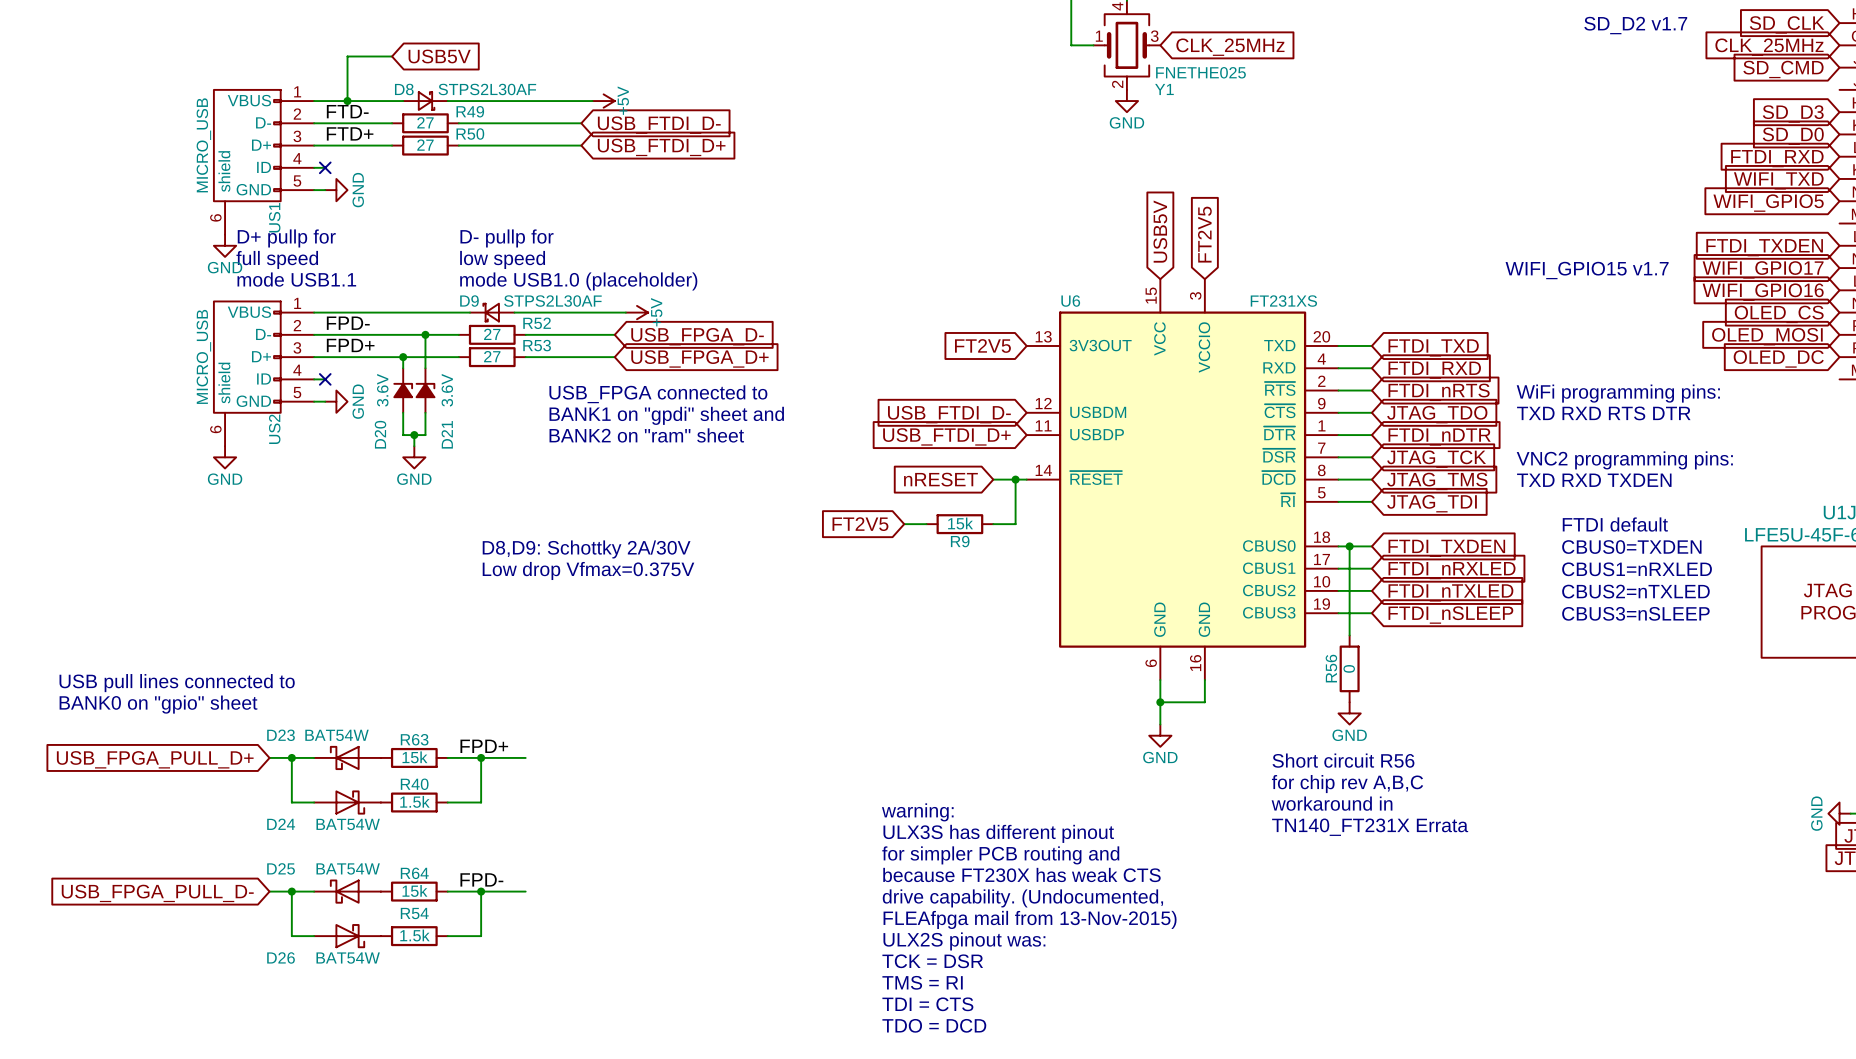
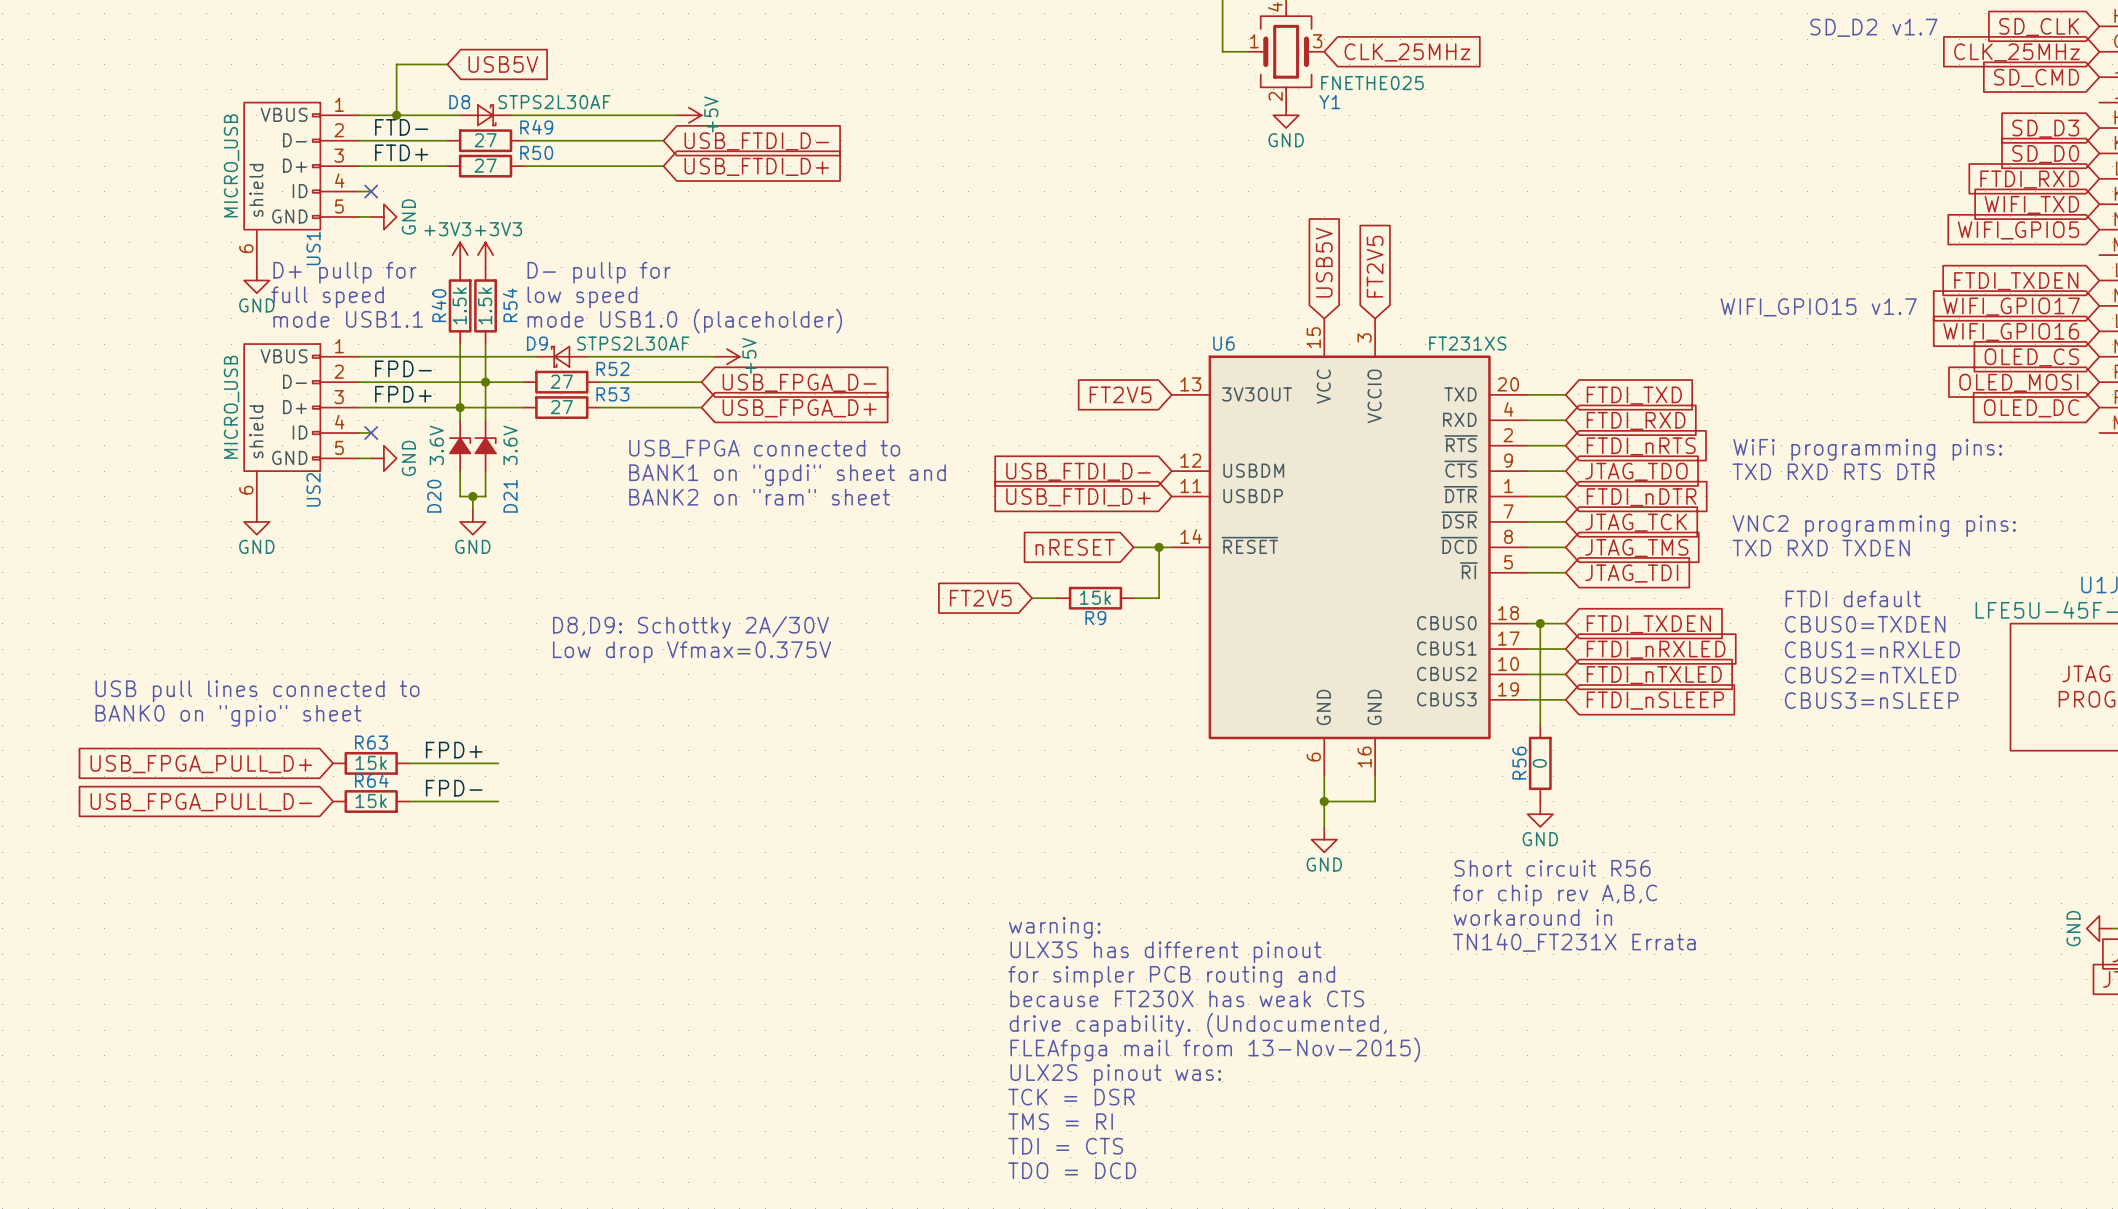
power symbol: none -> +3V3 (460, 255)
power symbol: none -> +3V3 (485, 255)
wire: none -> (460, 344) (460, 407)
wire: none -> (485, 344) (485, 382)
wire: none -> (409, 763) (498, 763)
text position: USB pull lines connected to (177, 683) -> USB pull lines connected to (257, 691)
text position: BANK0 on "gpio" sheet (158, 704) -> BANK0 on "gpio" sheet (228, 715)
label position: FPD+ (484, 746) -> FPD+ (454, 750)
wire: (269, 757) (314, 757) -> none
wire: (291, 757) (291, 802) (314, 802) -> none
junction: (291, 757) -> none
D23: BAT54W (347, 757) -> none
R63 position: (414, 757) -> (371, 763)
wire: (447, 757) (525, 757) -> (409, 801) (498, 801)
wire: (481, 757) (481, 802) (447, 802) -> none
junction: (481, 757) -> none
global label position: USB_FPGA_PULL_D+ (155, 759) -> USB_FPGA_PULL_D+ (201, 764)
R40 name position: R40 (414, 784) -> R40 (439, 305)
D24: BAT54W (347, 802) -> none
R40 rotation: 0° (414, 802) -> 90° clockwise (460, 305)
R40 position: (414, 802) -> (460, 305)
label position: FPD- (481, 879) -> FPD- (454, 788)
wire: (269, 891) (314, 891) -> none
wire: (291, 891) (291, 936) (314, 936) -> none
junction: (291, 891) -> none
D25: BAT54W (347, 891) -> none
R64 position: (414, 891) -> (371, 801)
wire: (447, 891) (525, 891) -> none
wire: (481, 891) (481, 936) (447, 936) -> none
junction: (481, 891) -> none
global label position: USB_FPGA_PULL_D- (157, 893) -> USB_FPGA_PULL_D- (201, 802)
D26: BAT54W (347, 936) -> none
R54 rotation: 0° (414, 936) -> 90° clockwise (485, 305)
R54 position: (414, 936) -> (485, 305)

